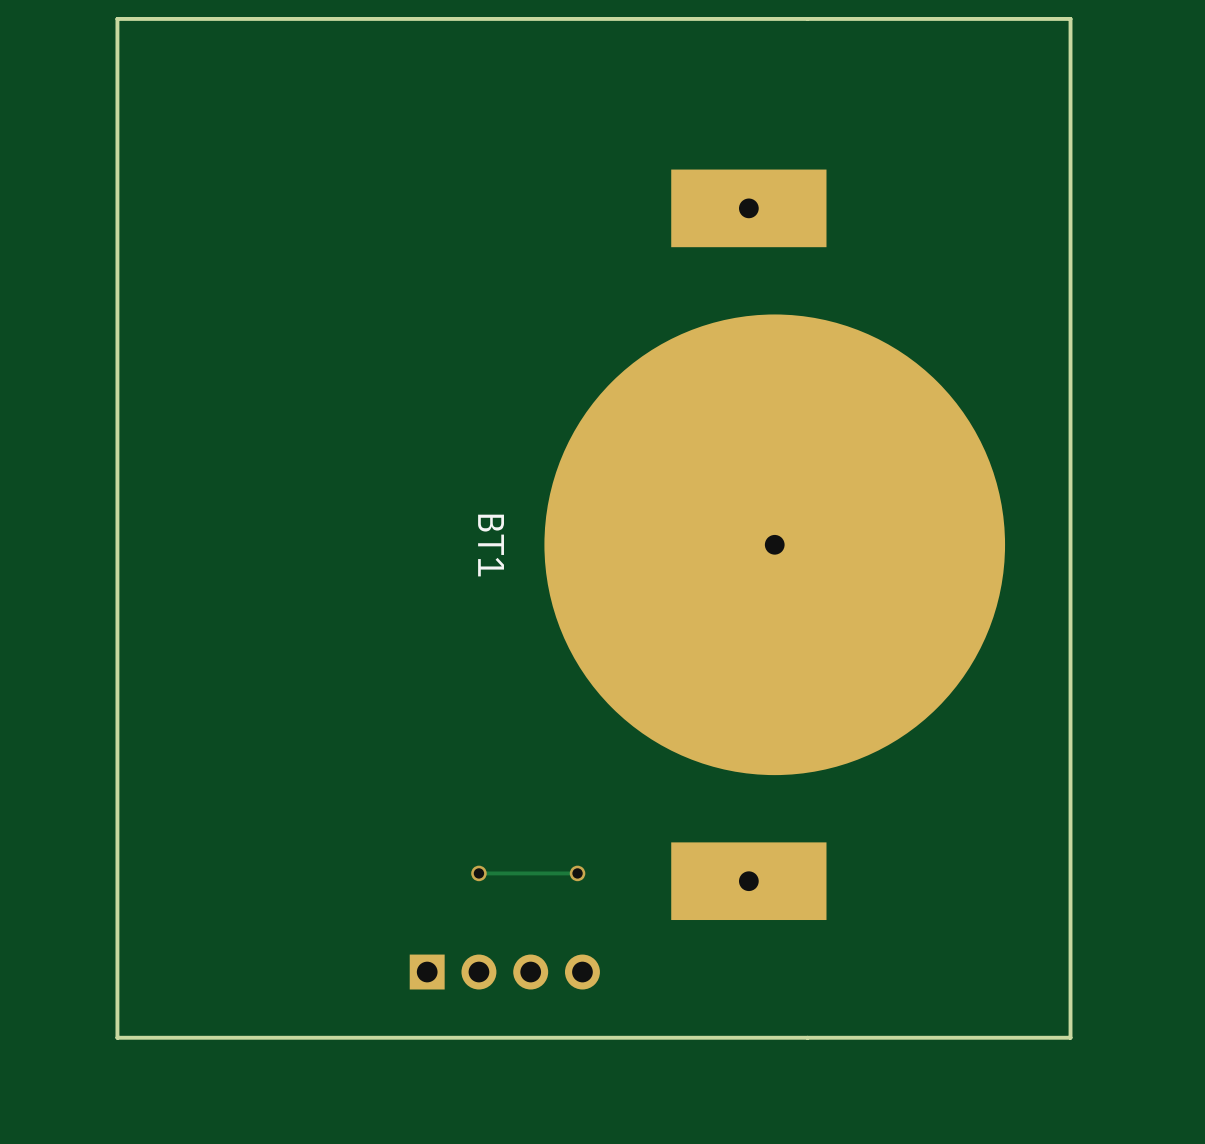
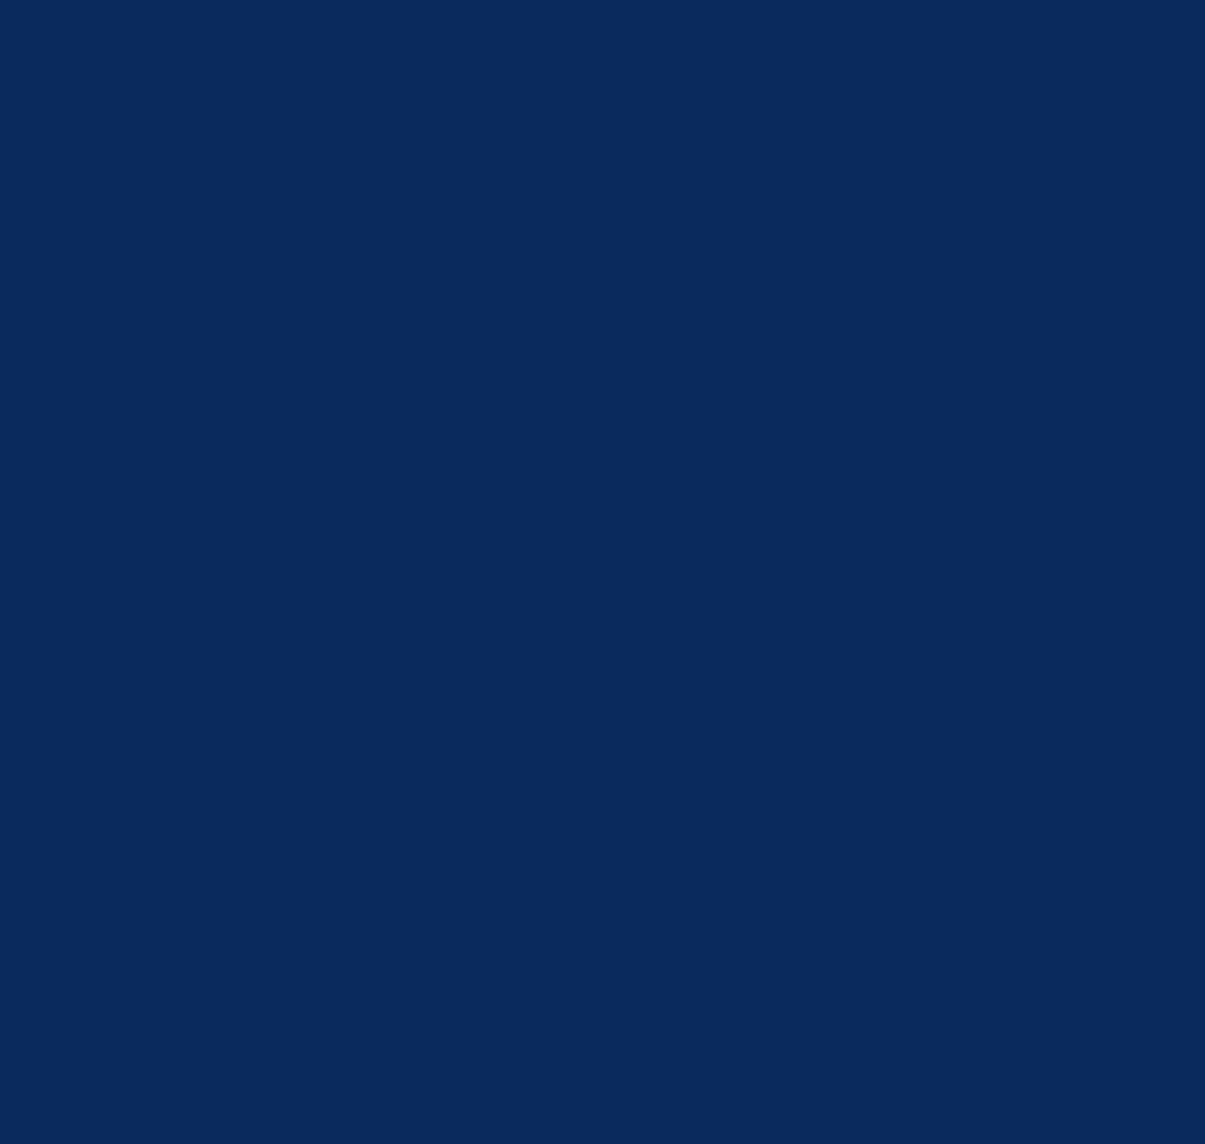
board edge: (1070, 18) (117, 18) (117, 1037) (1070, 1037) (1070, 18) -> none
BT1: (774, 544) -> none
via: (478, 873) -> none
track: (577, 873) (478, 873) -> none
via: (577, 873) -> none
part: (504, 972) -> none

